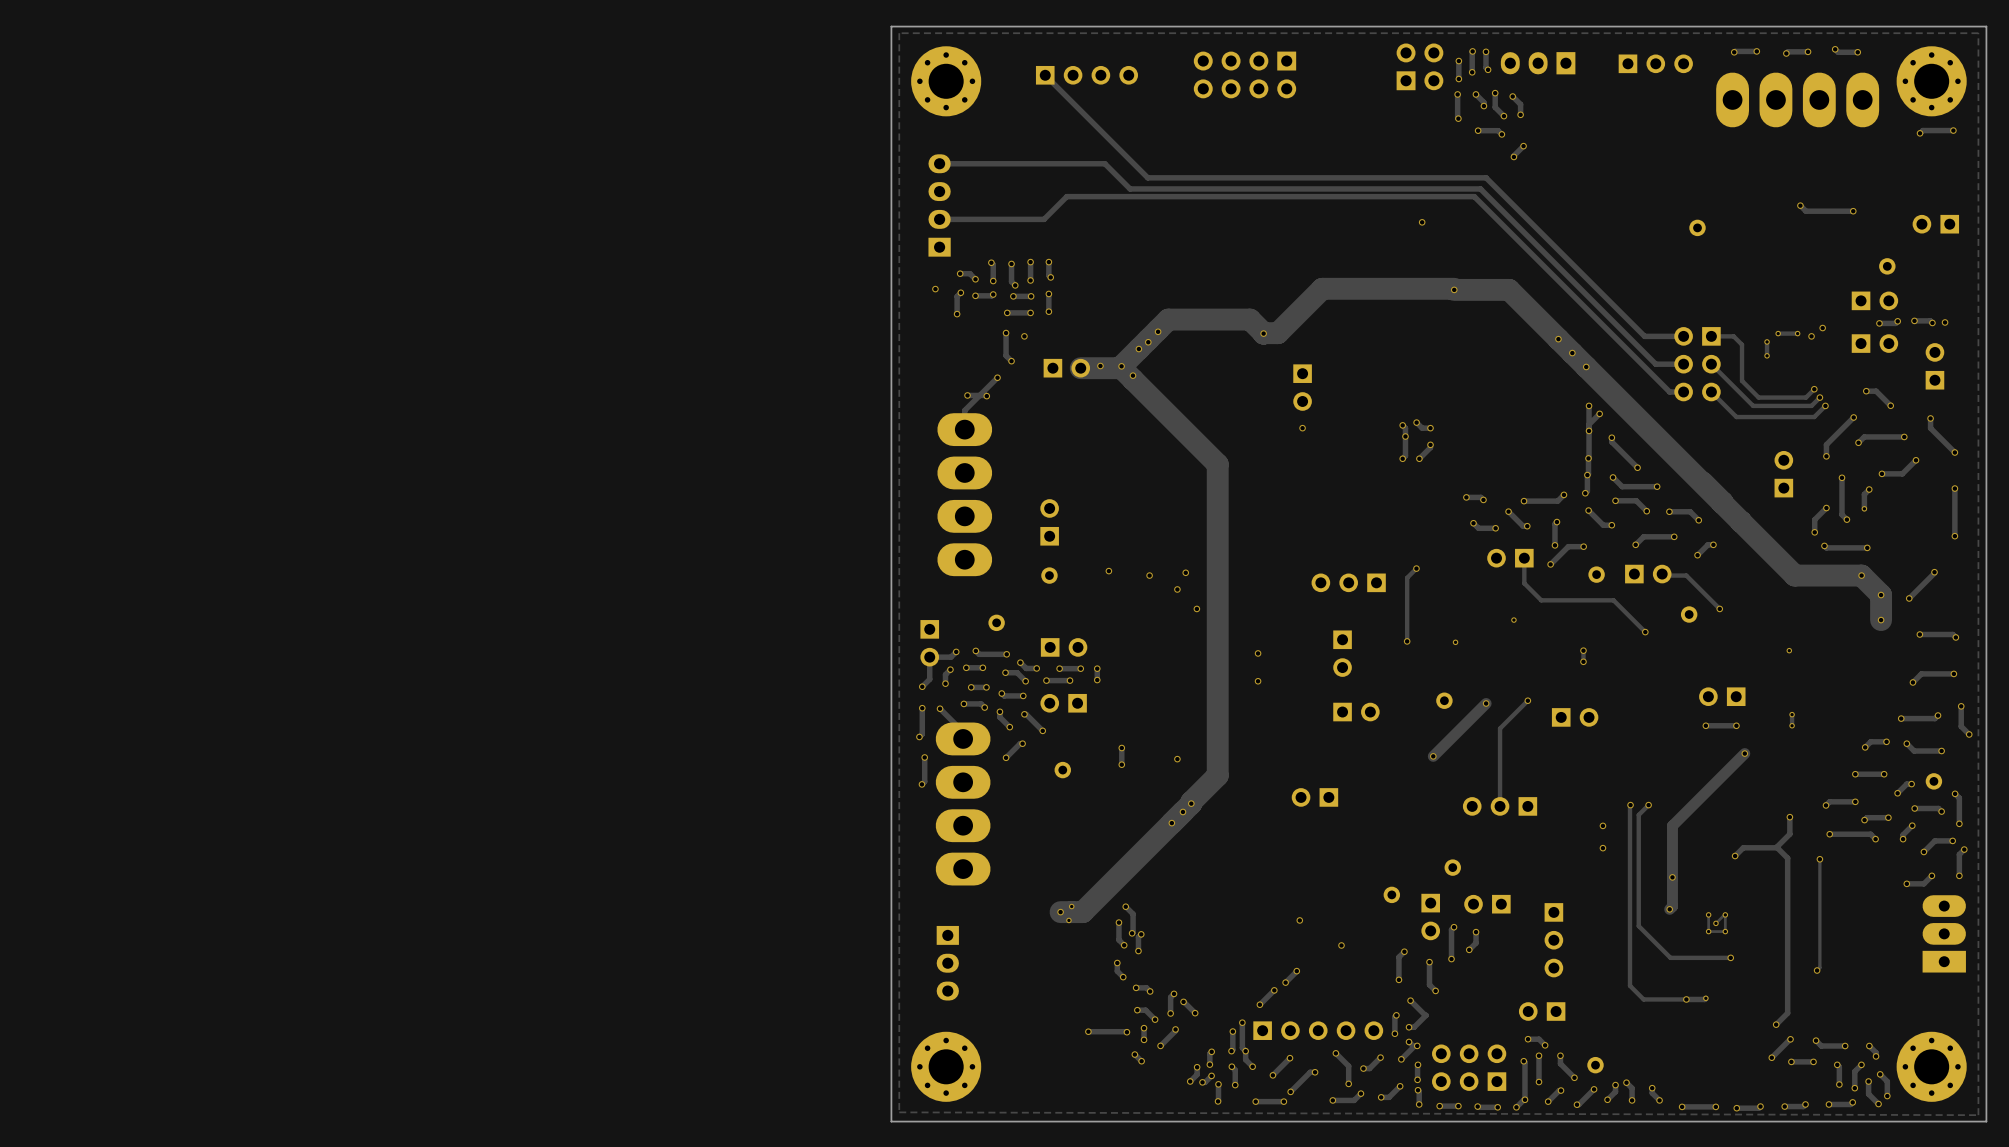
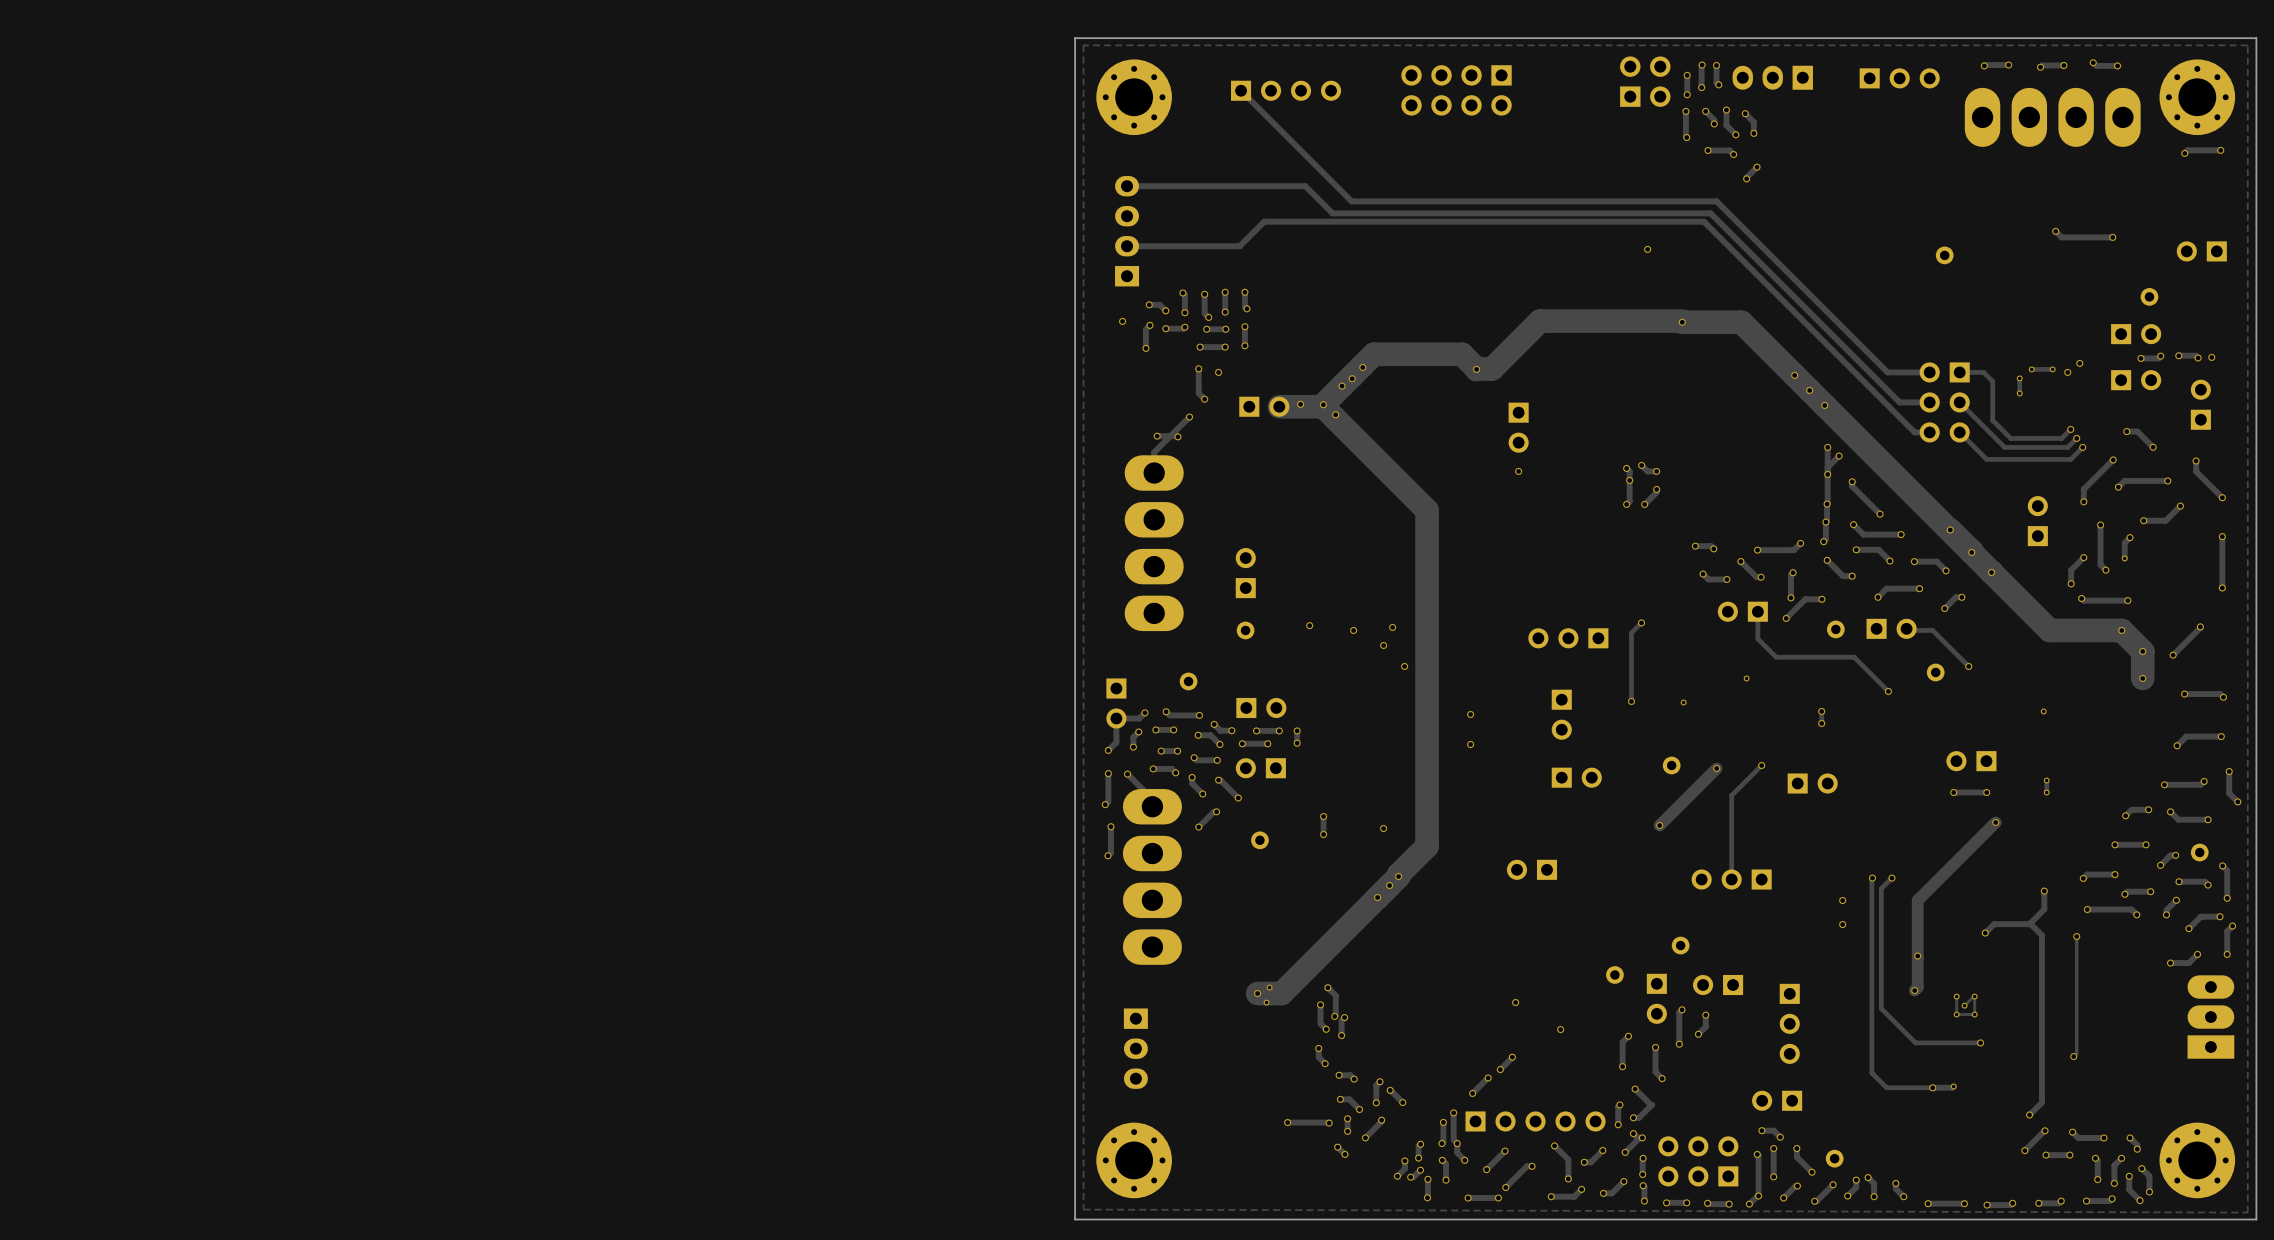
via: none -> (1950, 529)
via: none -> (1971, 552)
via: none -> (1991, 572)

